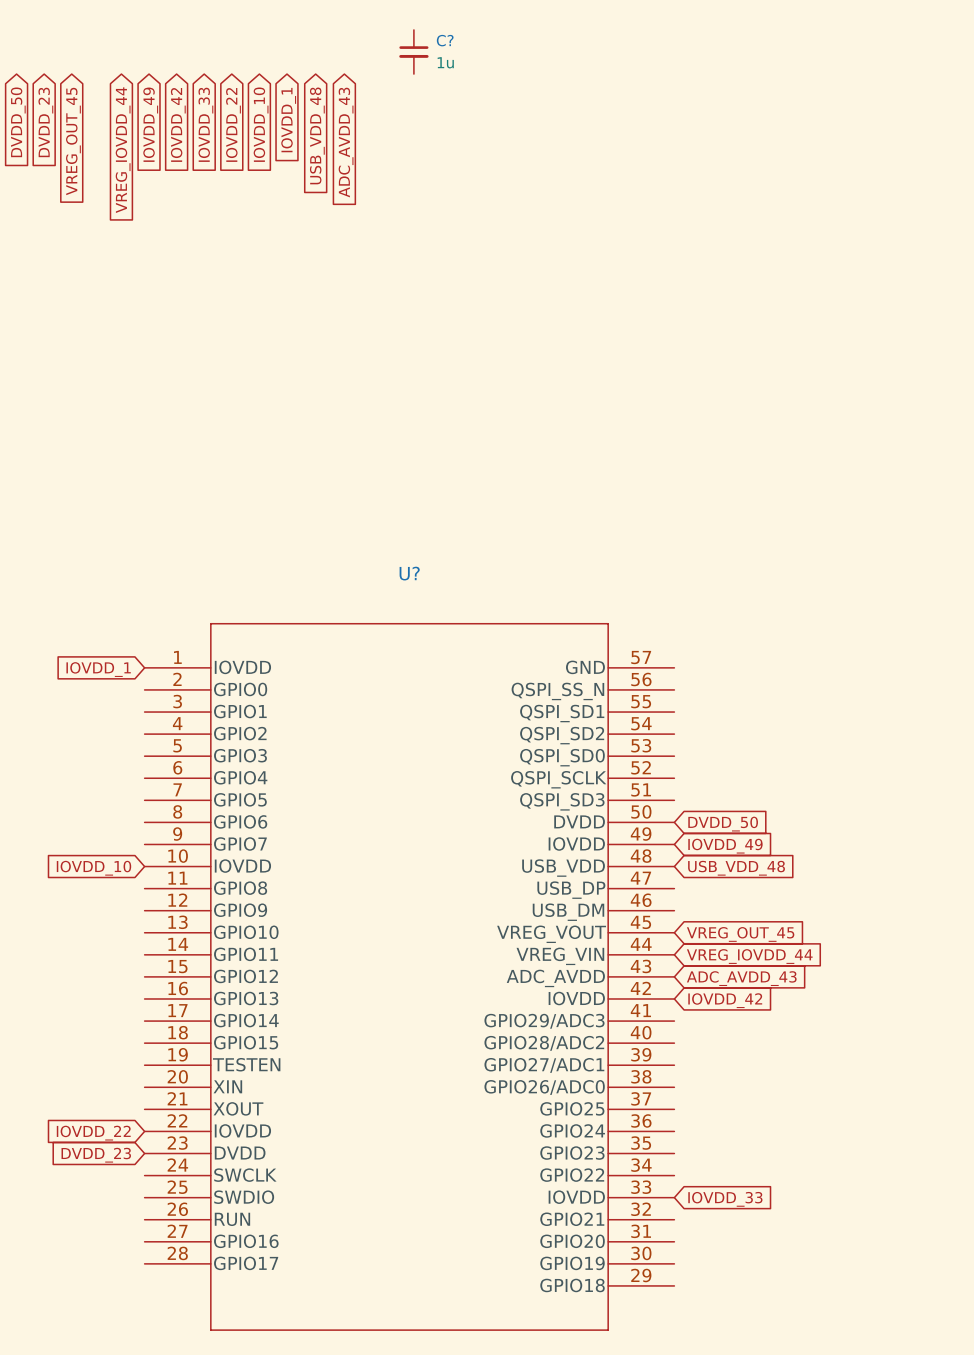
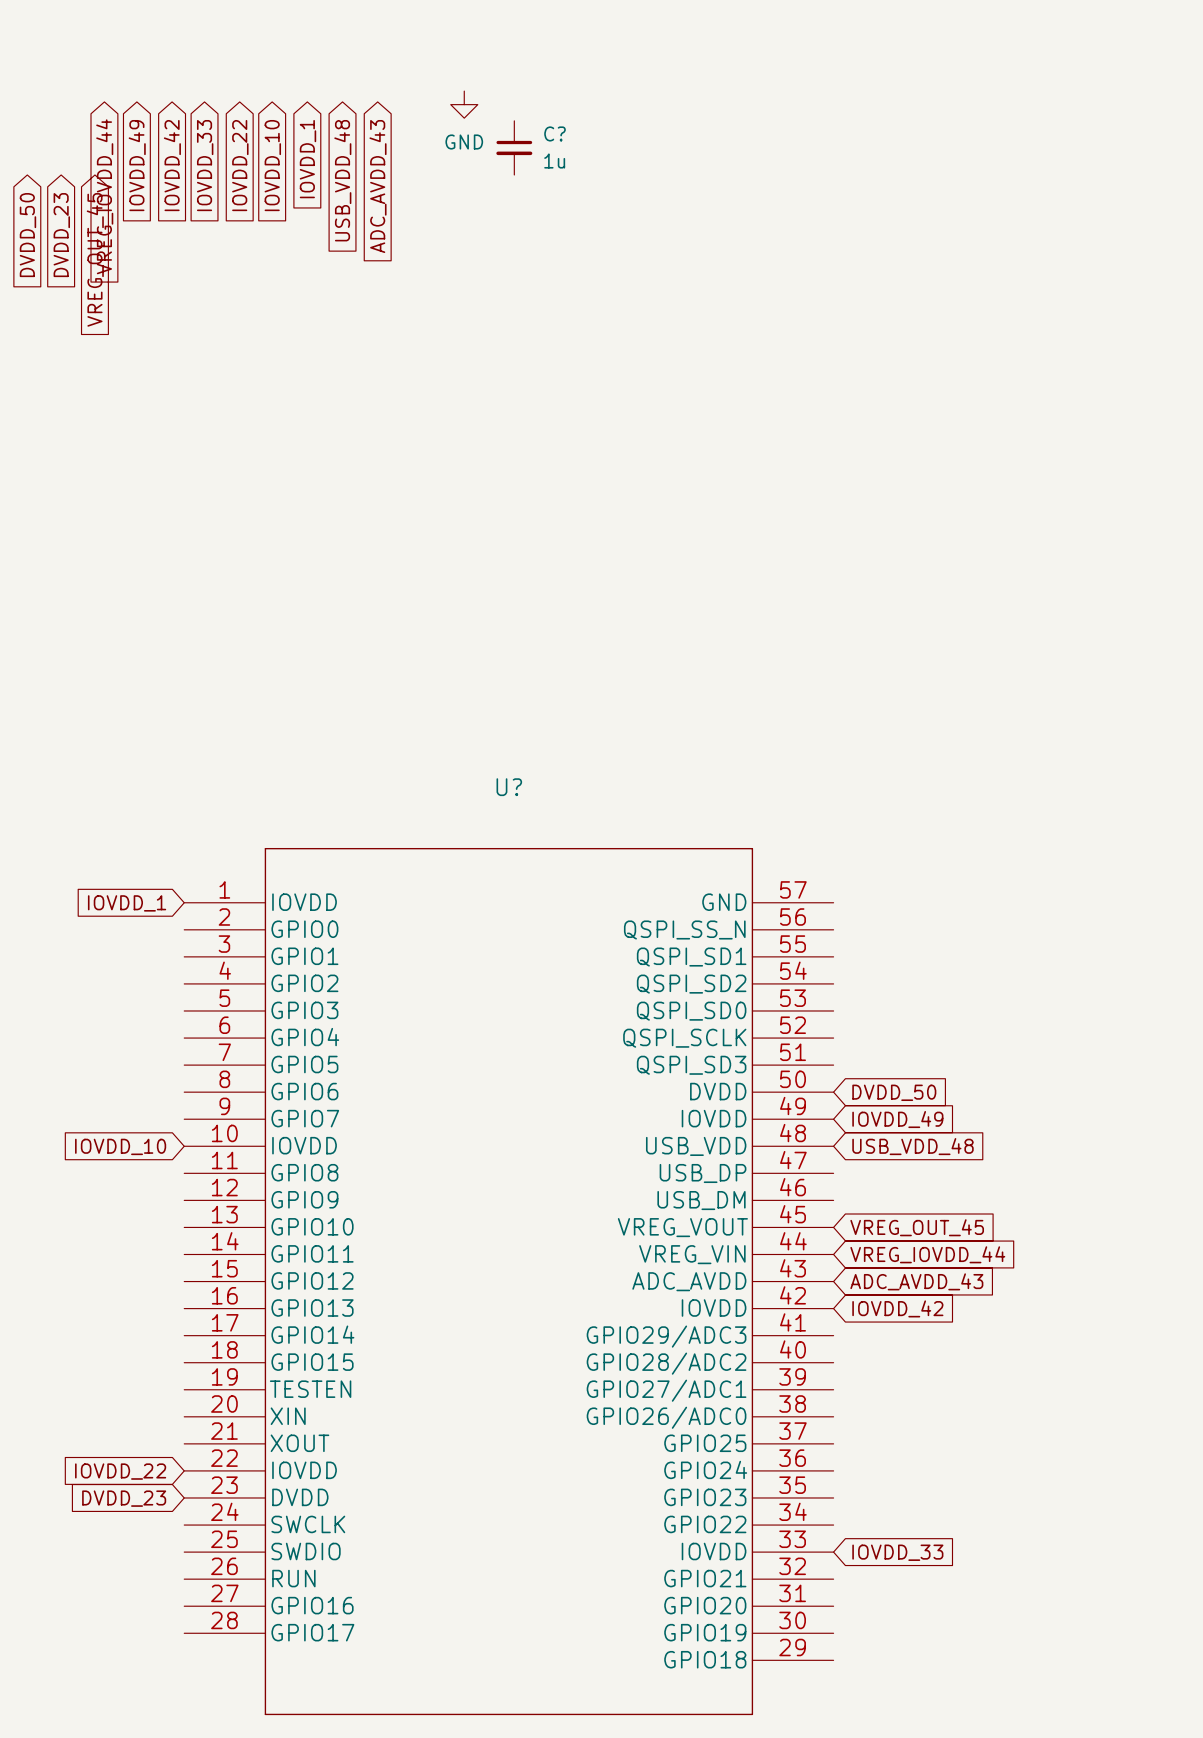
power symbol: none -> GND (464, 104)
global label position: IOVDD_1 (288, 120) -> IOVDD_1 (307, 159)
global label position: IOVDD_49 (150, 124) -> IOVDD_49 (137, 165)
global label position: IOVDD_42 (178, 124) -> IOVDD_42 (172, 165)
global label position: IOVDD_33 (205, 124) -> IOVDD_33 (205, 165)
global label position: IOVDD_22 (233, 124) -> IOVDD_22 (240, 165)
global label position: IOVDD_10 (261, 124) -> IOVDD_10 (272, 165)
global label position: USB_VDD_48 (317, 135) -> USB_VDD_48 (342, 180)
global label position: ADC_AVDD_43 (346, 142) -> ADC_AVDD_43 (378, 186)
global label position: VREG_IOVDD_44 (123, 150) -> VREG_IOVDD_44 (104, 196)

